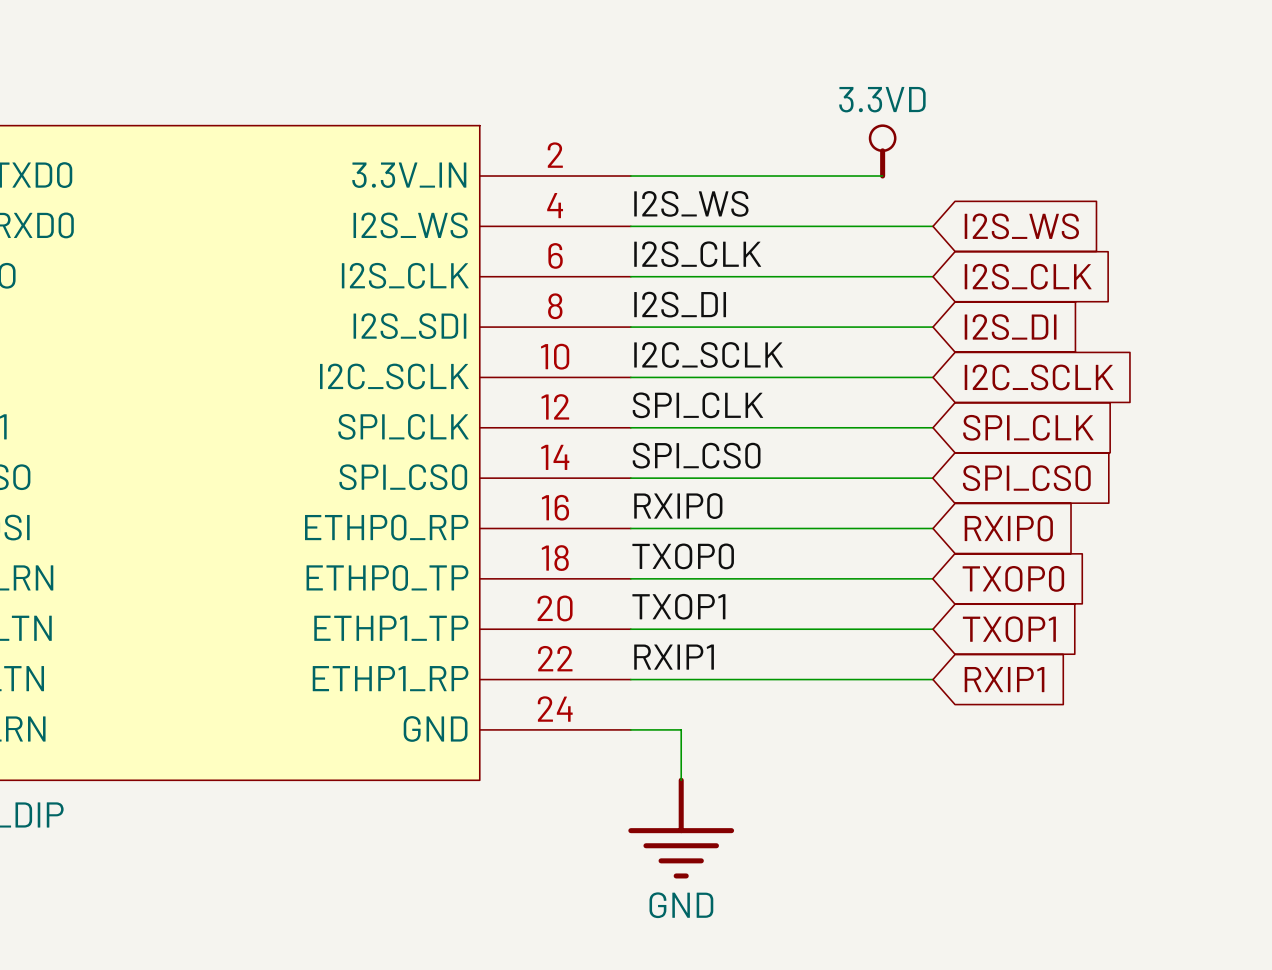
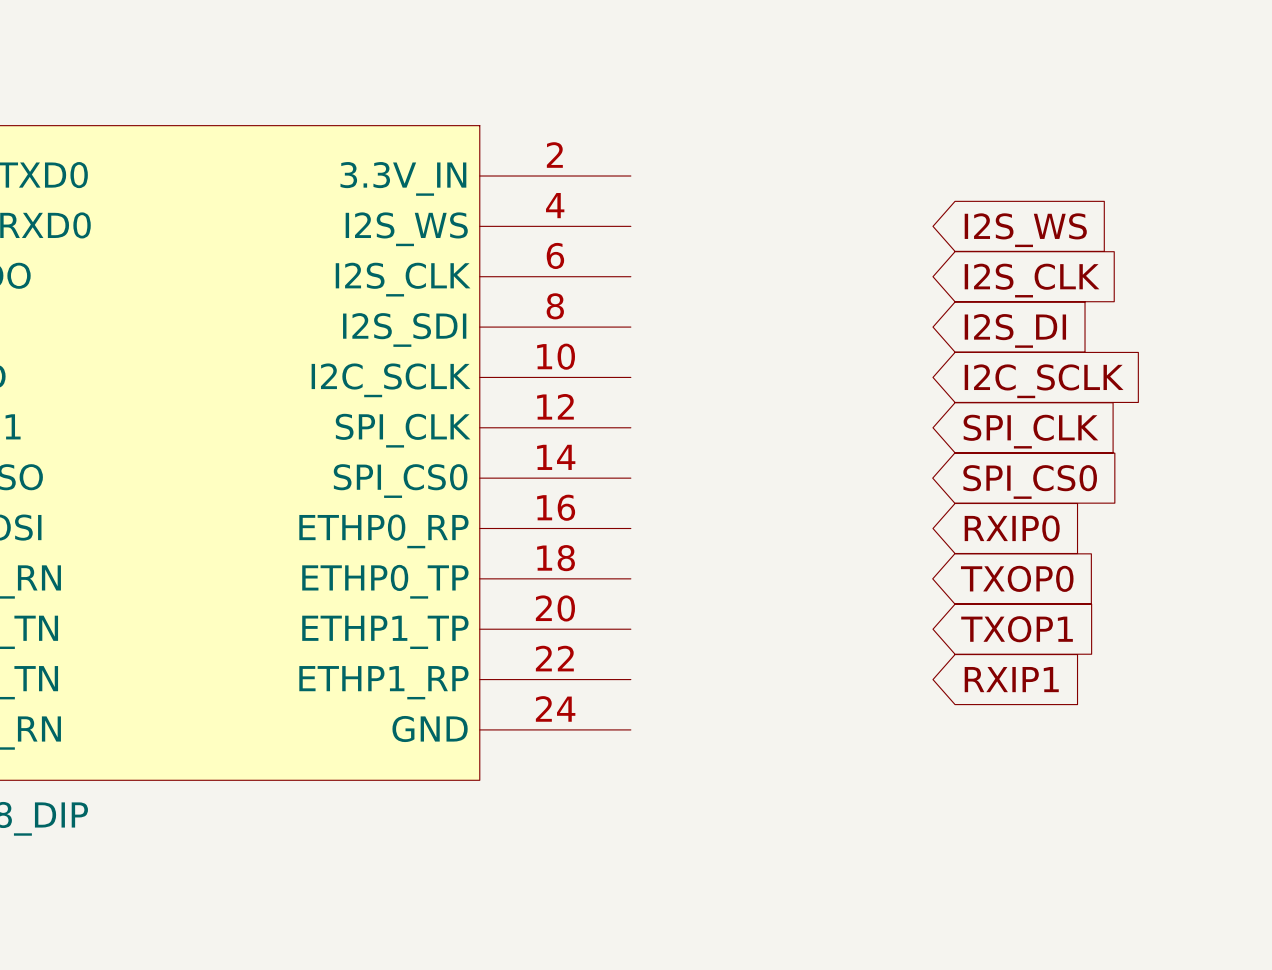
power symbol: 3.3VD (882, 151) -> none
wire: (630, 176) (882, 176) -> none
label: I2S_WS (691, 203) -> none
wire: (630, 226) (932, 226) -> none
label: I2S_CLK (697, 254) -> none
wire: (630, 276) (932, 276) -> none
label: I2S_DI (680, 304) -> none
wire: (630, 327) (932, 327) -> none
label: I2C_SCLK (708, 354) -> none
wire: (630, 377) (932, 377) -> none
label: SPI_CLK (697, 405) -> none
wire: (630, 427) (932, 427) -> none
label: SPI_CS0 (696, 455) -> none
wire: (630, 478) (932, 478) -> none
label: RXIP0 (678, 506) -> none
wire: (630, 528) (932, 528) -> none
label: TXOP0 (683, 556) -> none
wire: (630, 578) (932, 578) -> none
label: TXOP1 (678, 606) -> none
wire: (630, 629) (932, 629) -> none
label: RXIP1 (674, 657) -> none
wire: (630, 679) (932, 679) -> none
wire: (630, 729) (681, 729) (681, 780) -> none
power symbol: GND (681, 828) -> none

